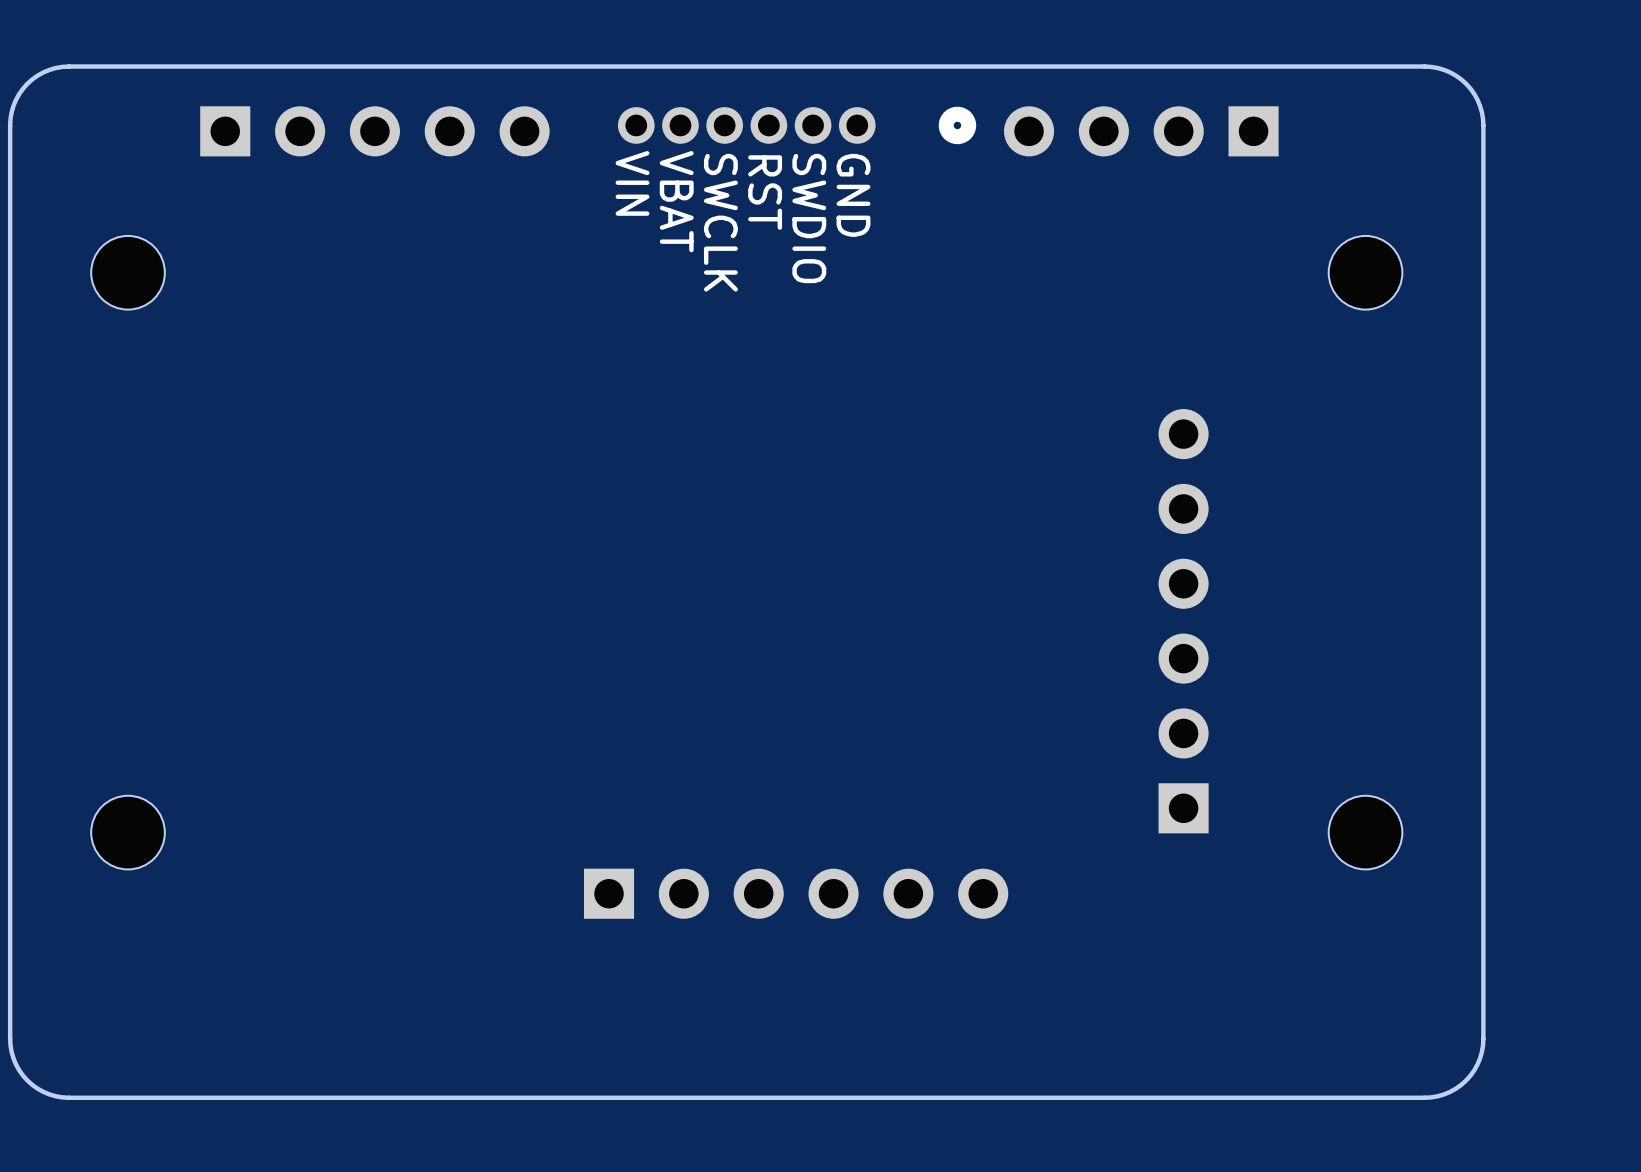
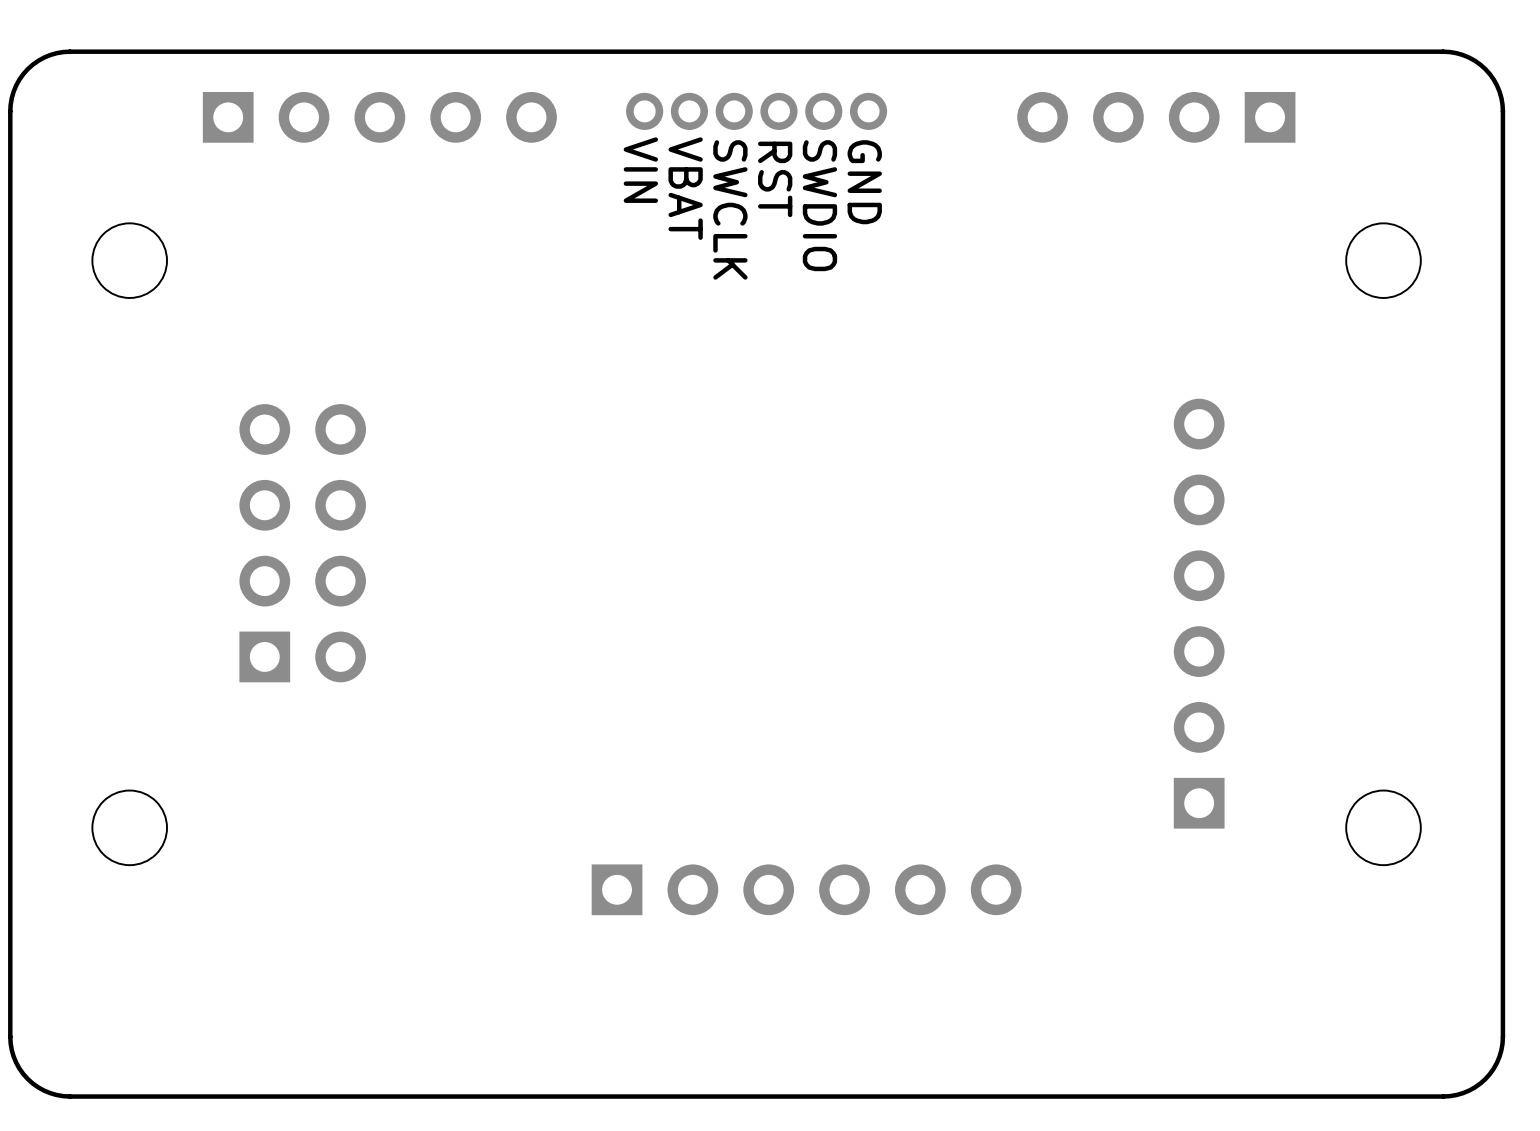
part: (797, 125) -> none
part: none -> (302, 543)

